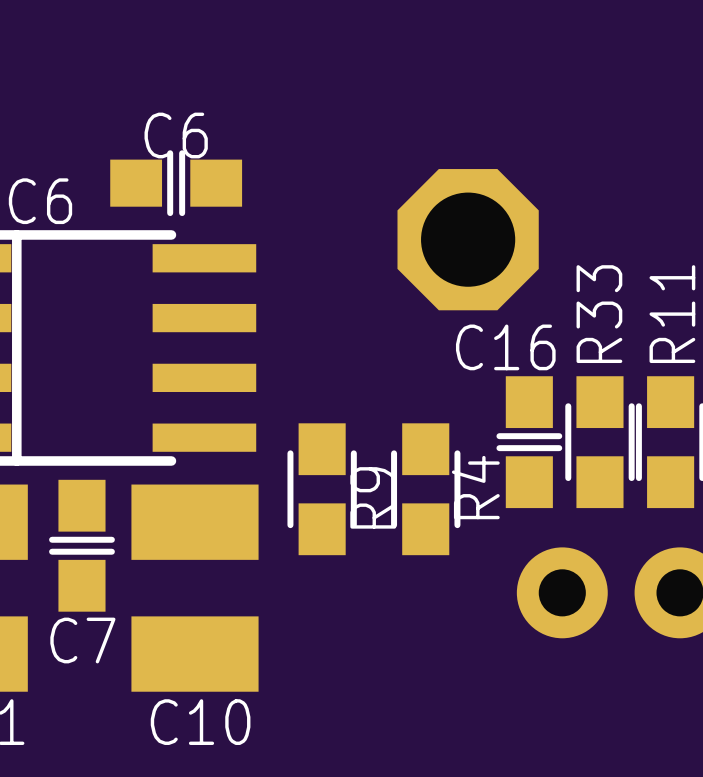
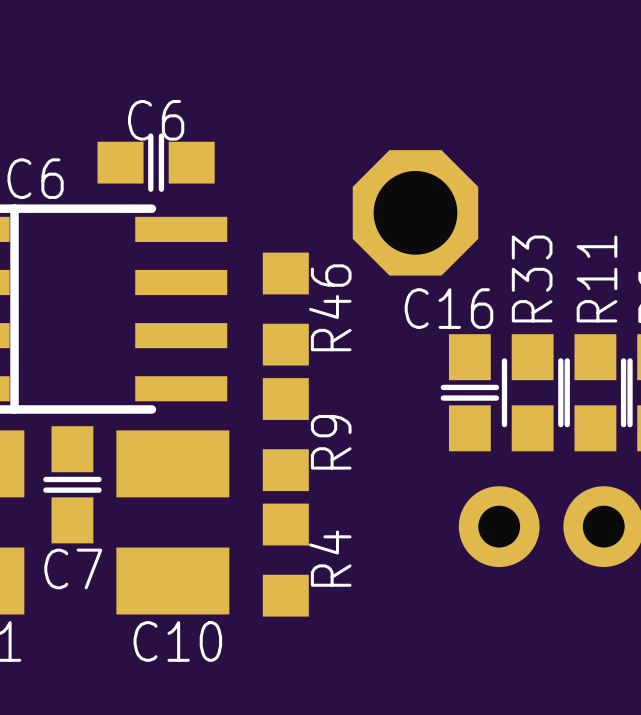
R46: none -> (285, 309)
R9 footprint: [287, 423, 357, 556] -> [262, 378, 309, 492]
R4 footprint: [391, 423, 461, 556] -> [262, 503, 309, 617]

